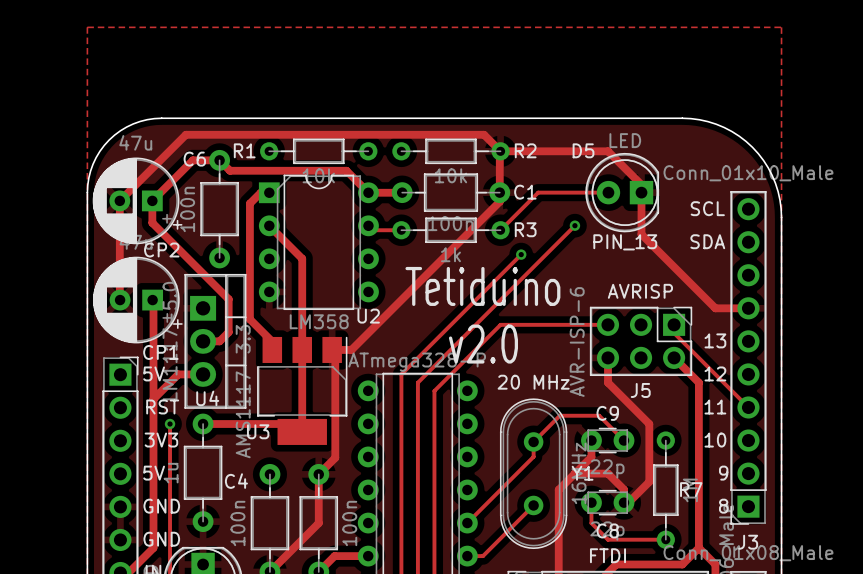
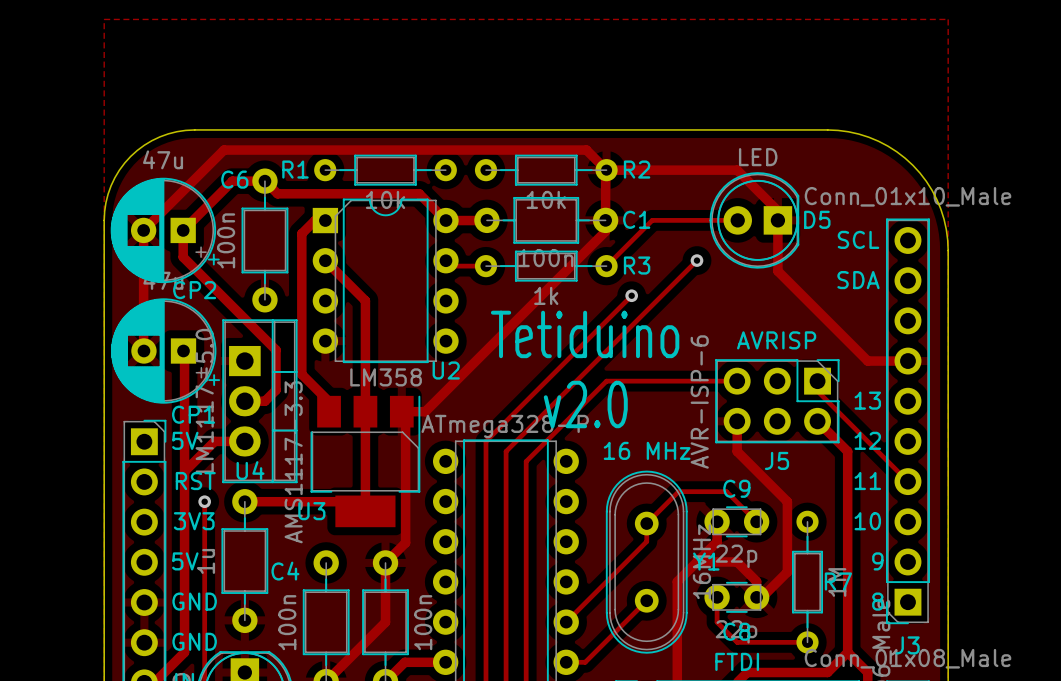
D5 name position: D5 (583, 150) -> D5 (817, 219)
text: PIN_13 (625, 242) -> none
text: 20 MHz (533, 382) -> 16 MHz (647, 450)

